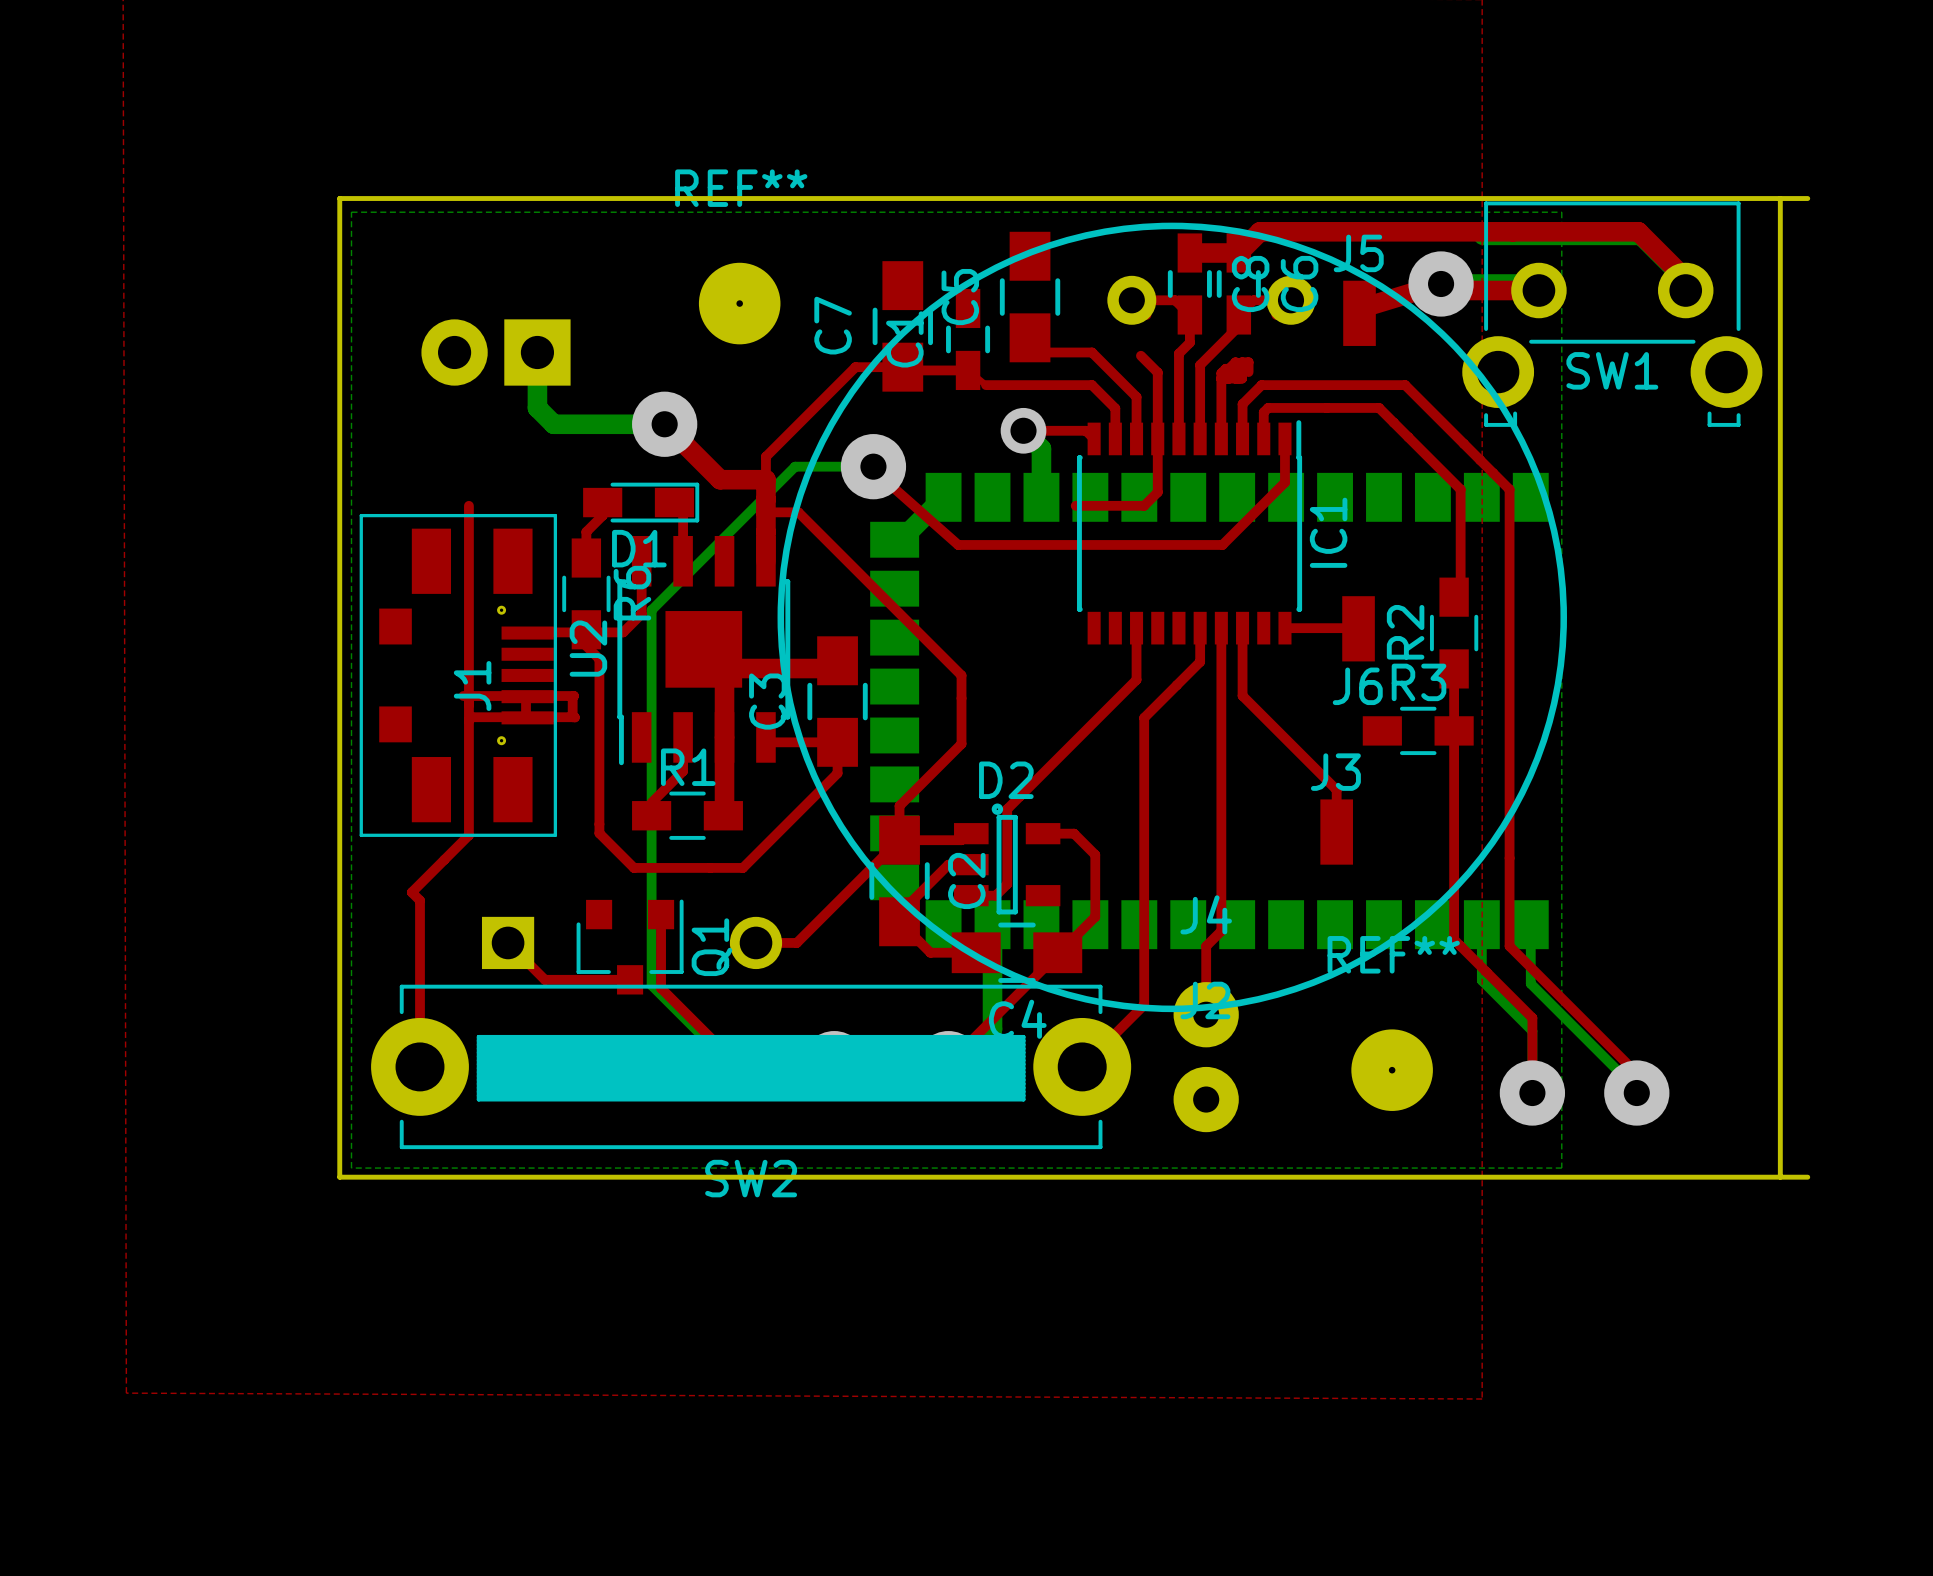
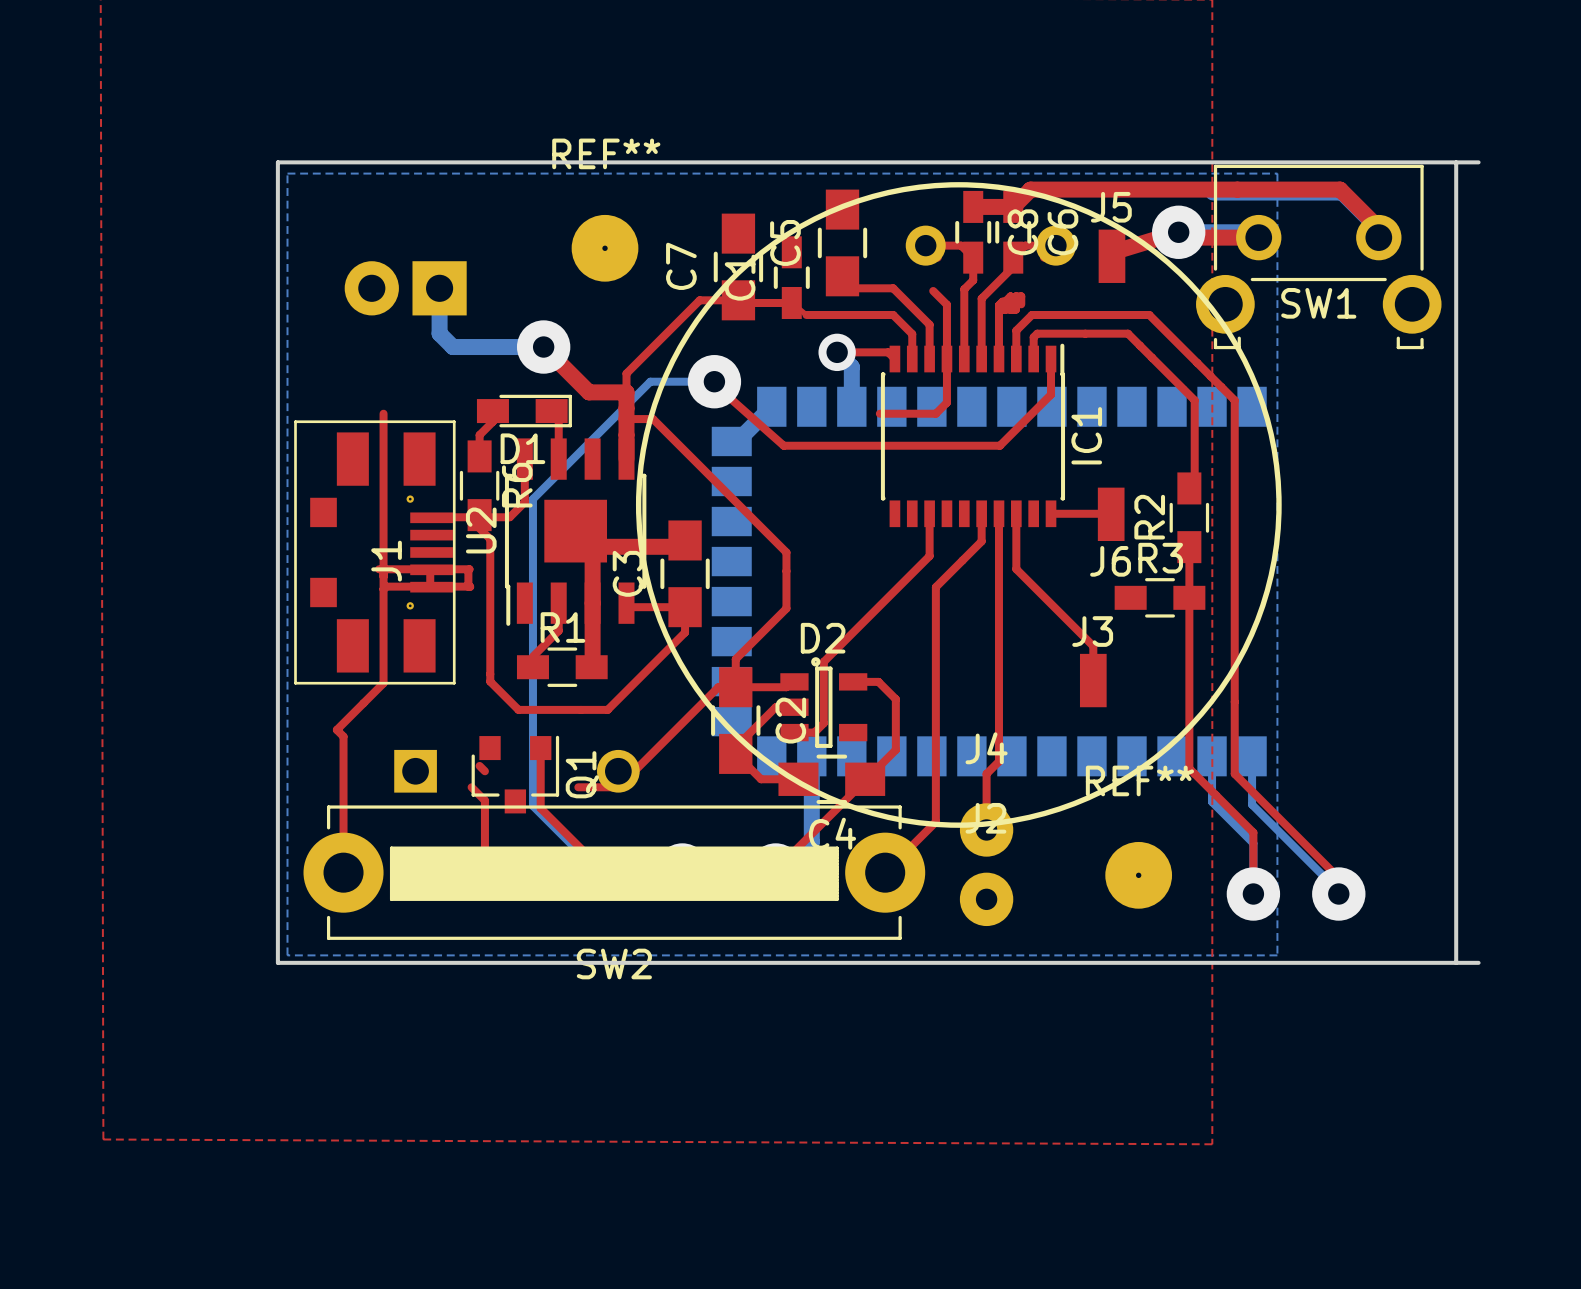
top track: (899, 840) (796, 942) (756, 942) -> (735, 687) (718, 687) (618, 787) (578, 787)
top track: none -> (479, 765) (484, 771)
top track: (508, 942) (544, 979) (630, 979) (622, 975) -> none
top track: none -> (471, 787) (484, 800) (484, 864)

